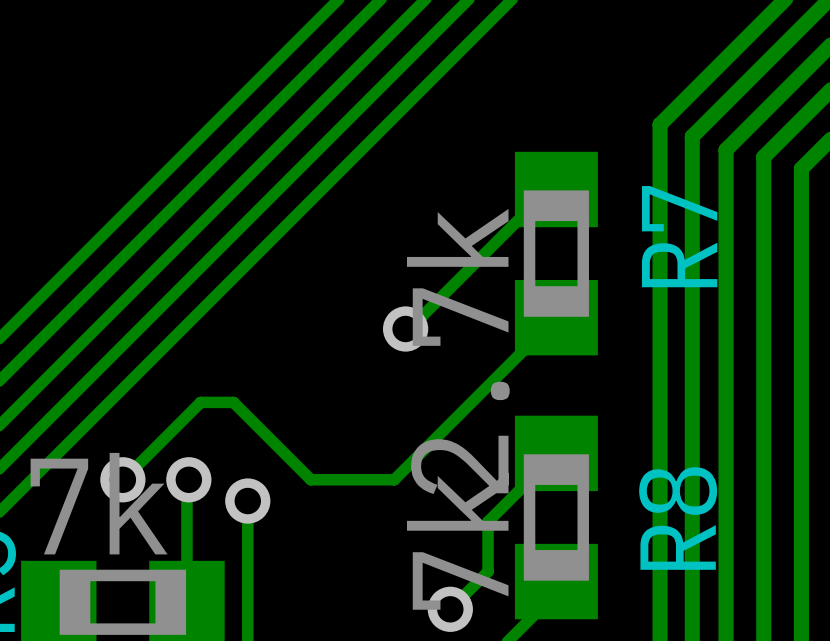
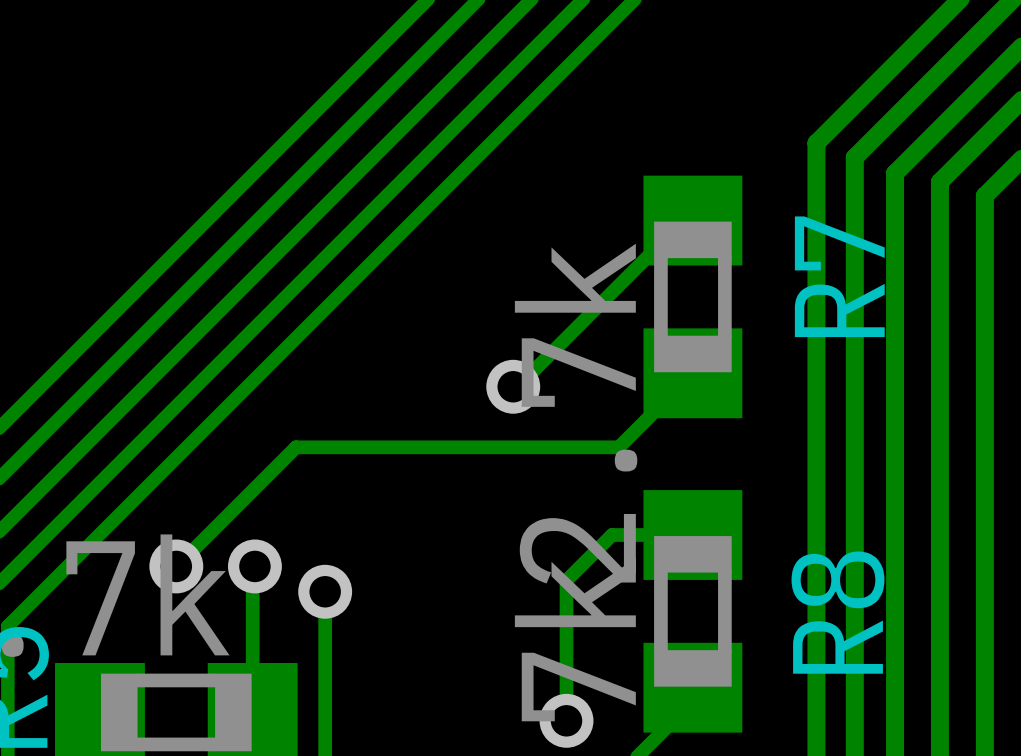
track: (494, 379) (394, 479) (310, 479) (233, 402) (200, 402) -> (618, 447) (295, 447) (269, 474)
track: (556, 453) (488, 521) (488, 571) (450, 609) -> (692, 535) (612, 535) (566, 580) (566, 720)

